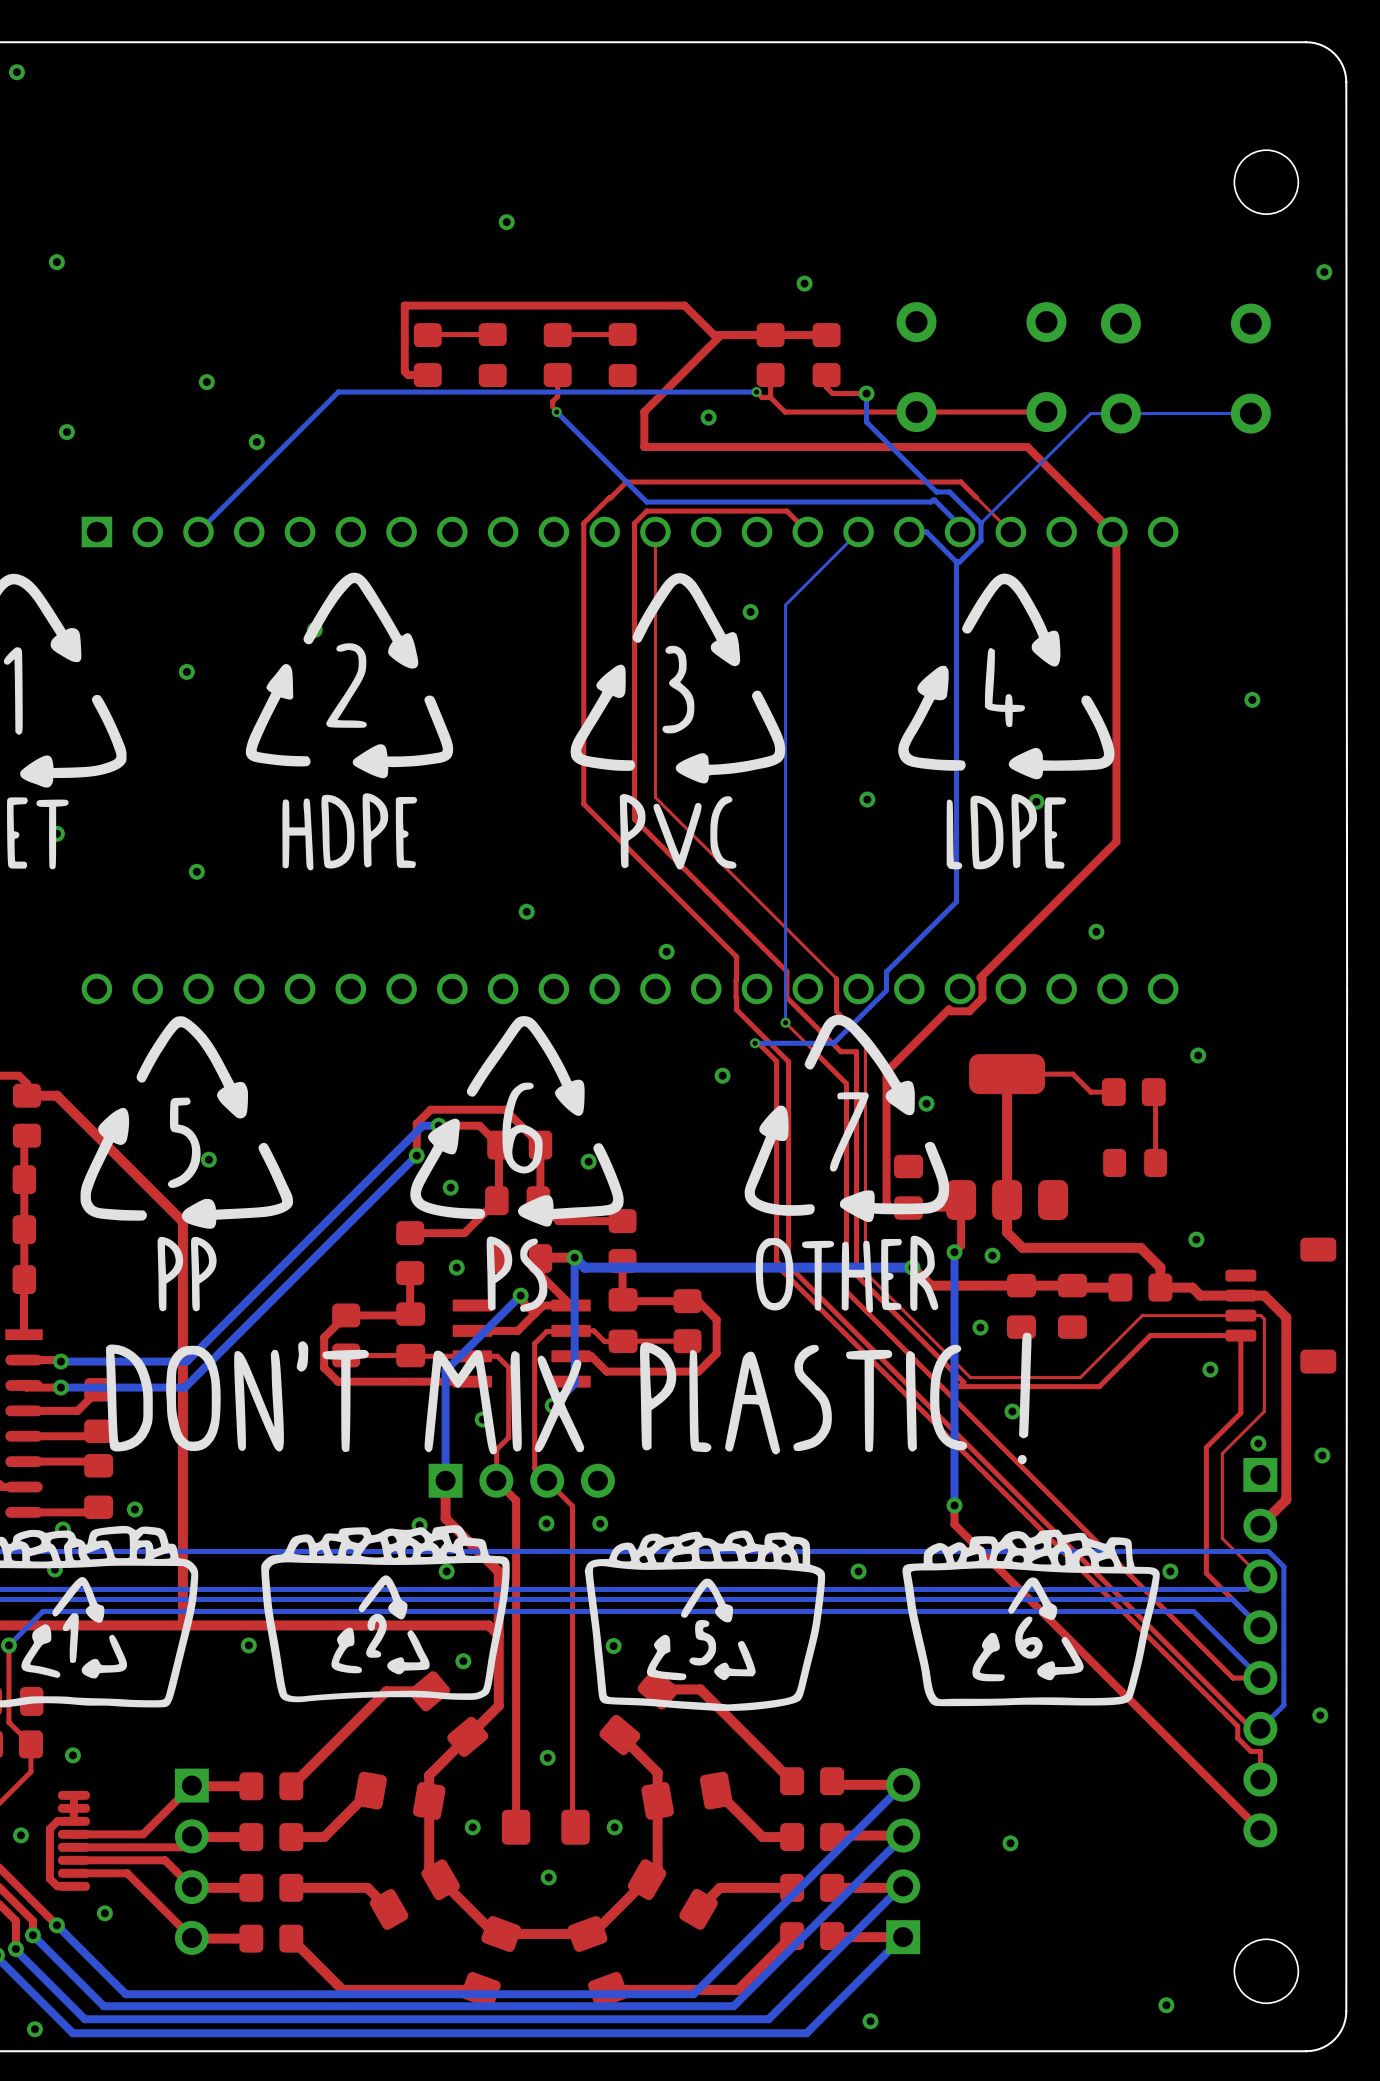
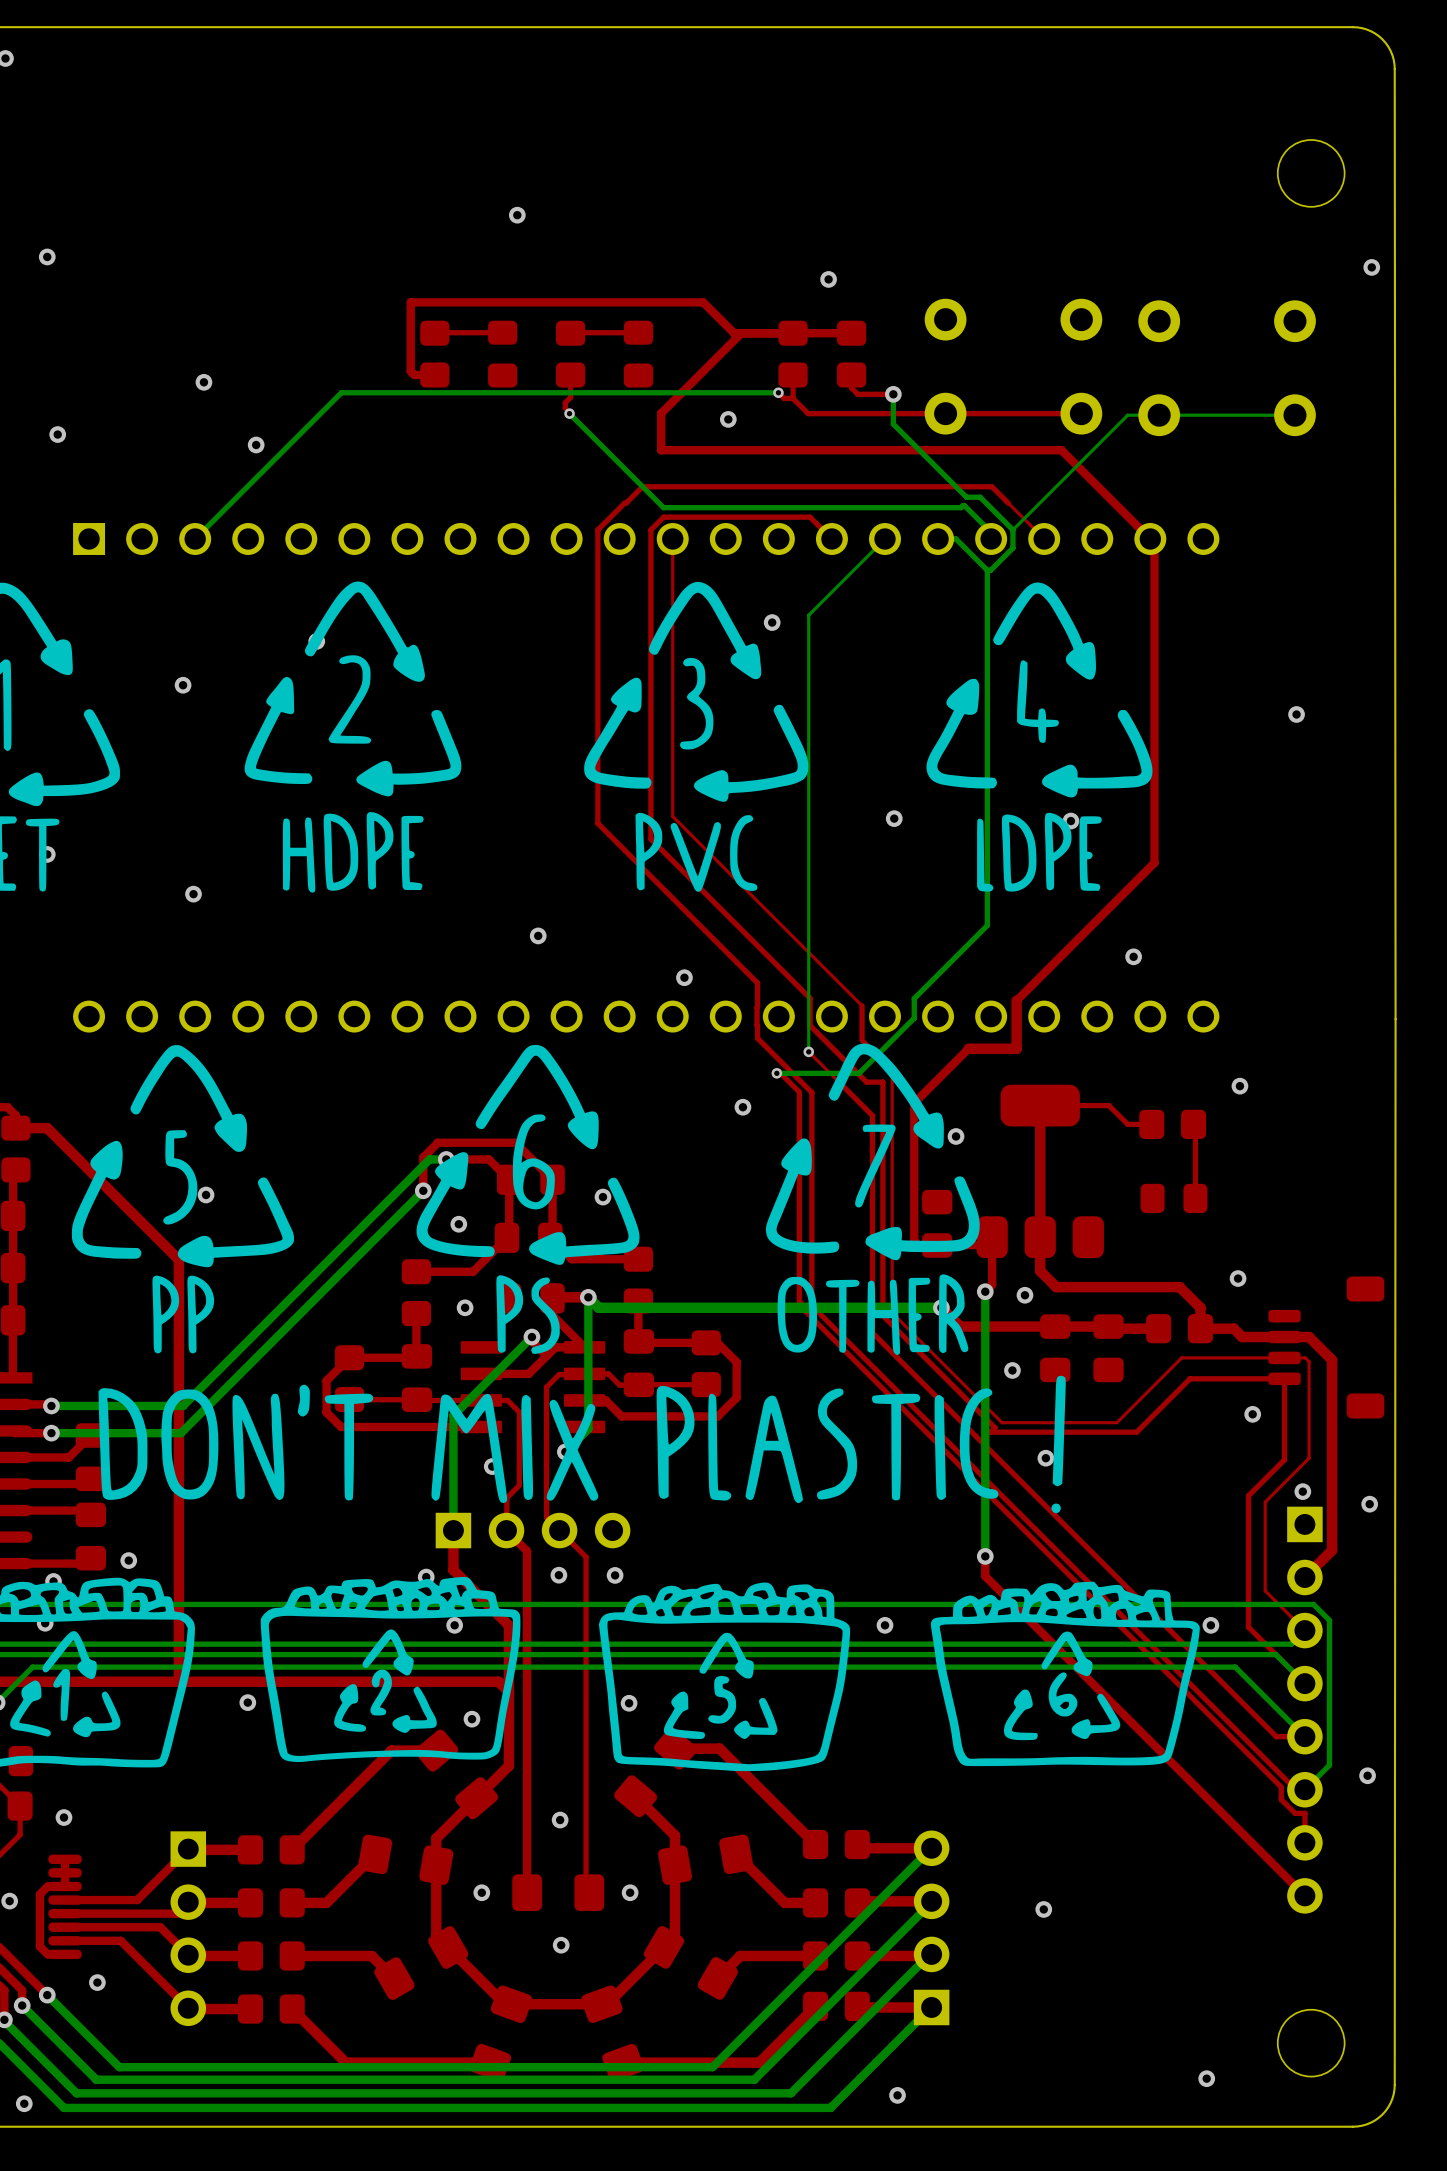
top track: (984, 973) (980, 977) (982, 979) (982, 998) (969, 1011) (950, 1011) (948, 1009) (938, 1019) -> (1016, 1000) (1016, 1048) (968, 1048)

